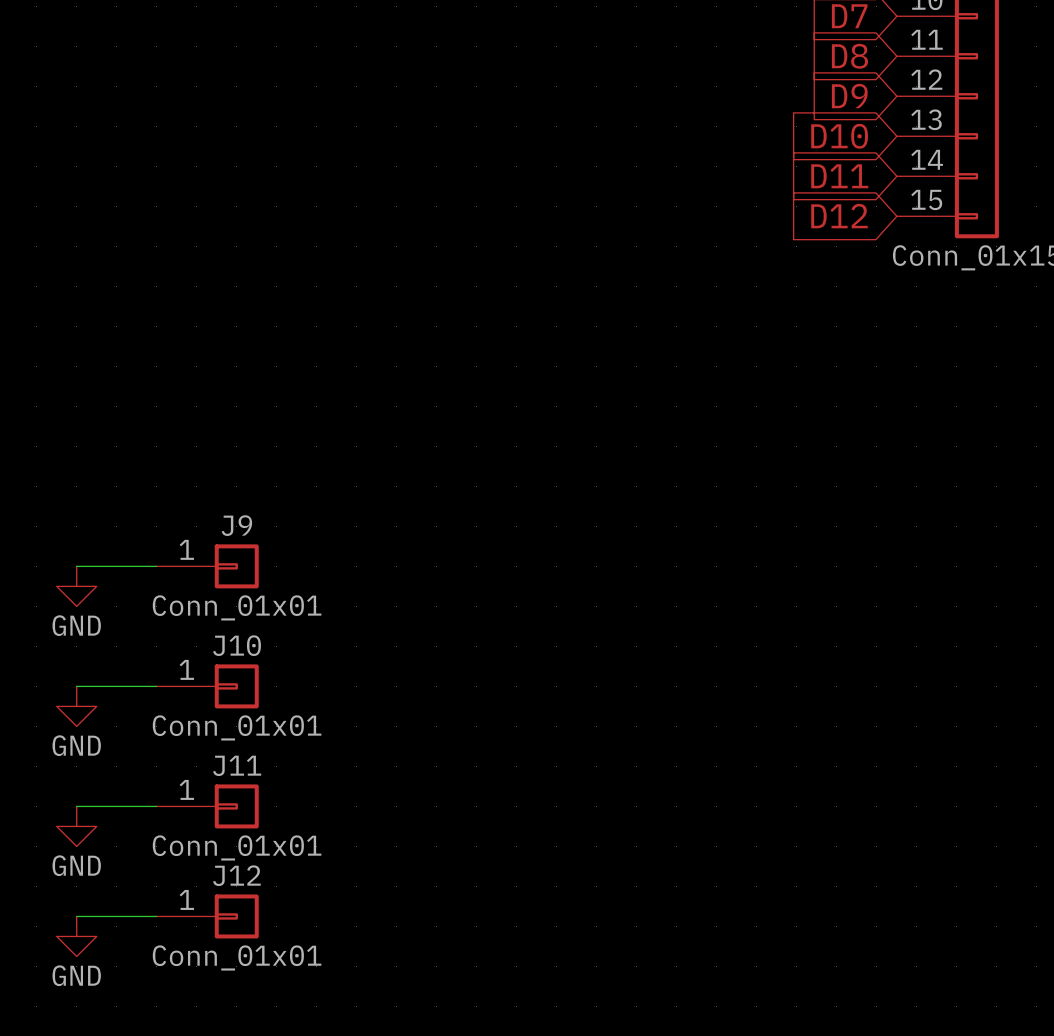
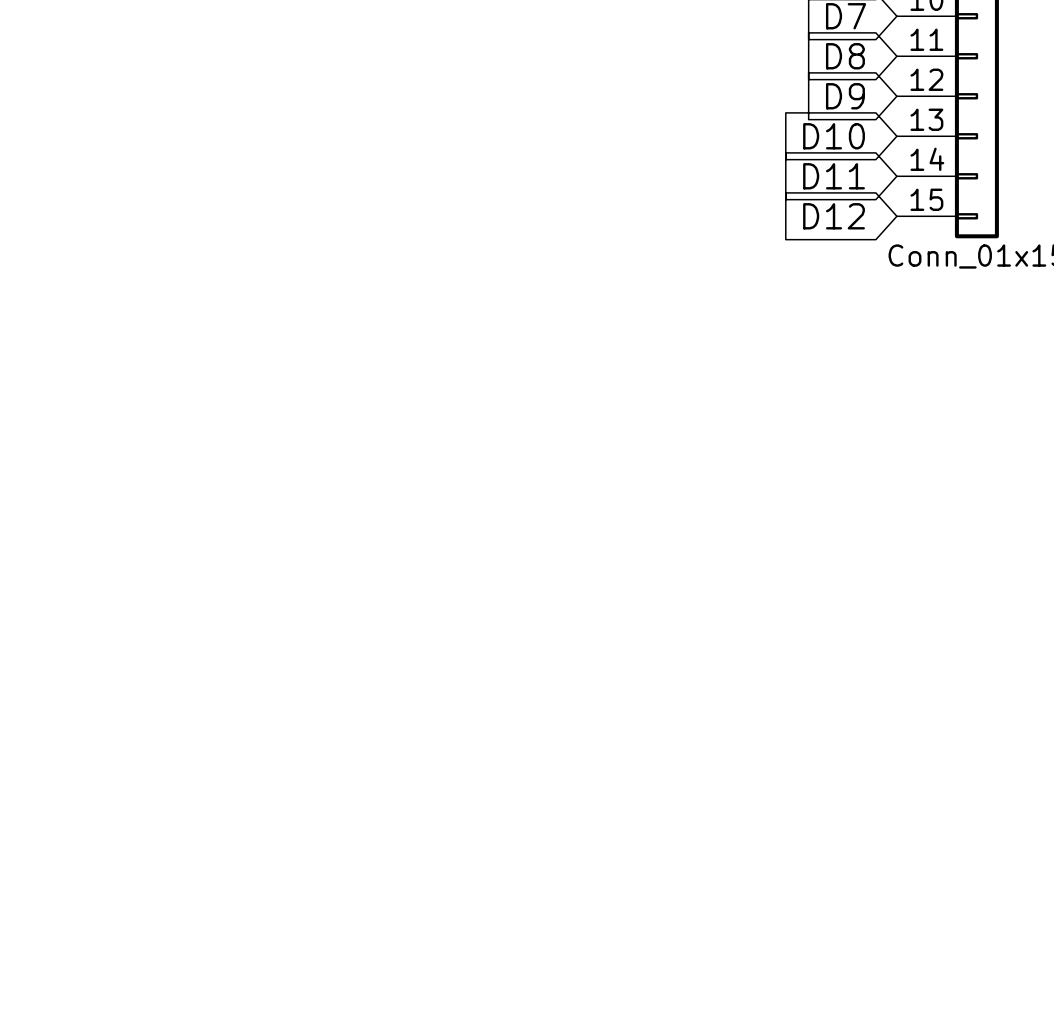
wire: (76, 566) (156, 566) -> none
J9: Conn_01x01 (207, 566) -> none
power symbol: GND (76, 586) -> none
wire: (76, 686) (156, 686) -> none
J10: Conn_01x01 (207, 686) -> none
power symbol: GND (76, 706) -> none
wire: (76, 806) (156, 806) -> none
J11: Conn_01x01 (207, 806) -> none
power symbol: GND (76, 826) -> none
wire: (76, 916) (156, 916) -> none
J12: Conn_01x01 (207, 916) -> none
power symbol: GND (76, 936) -> none

